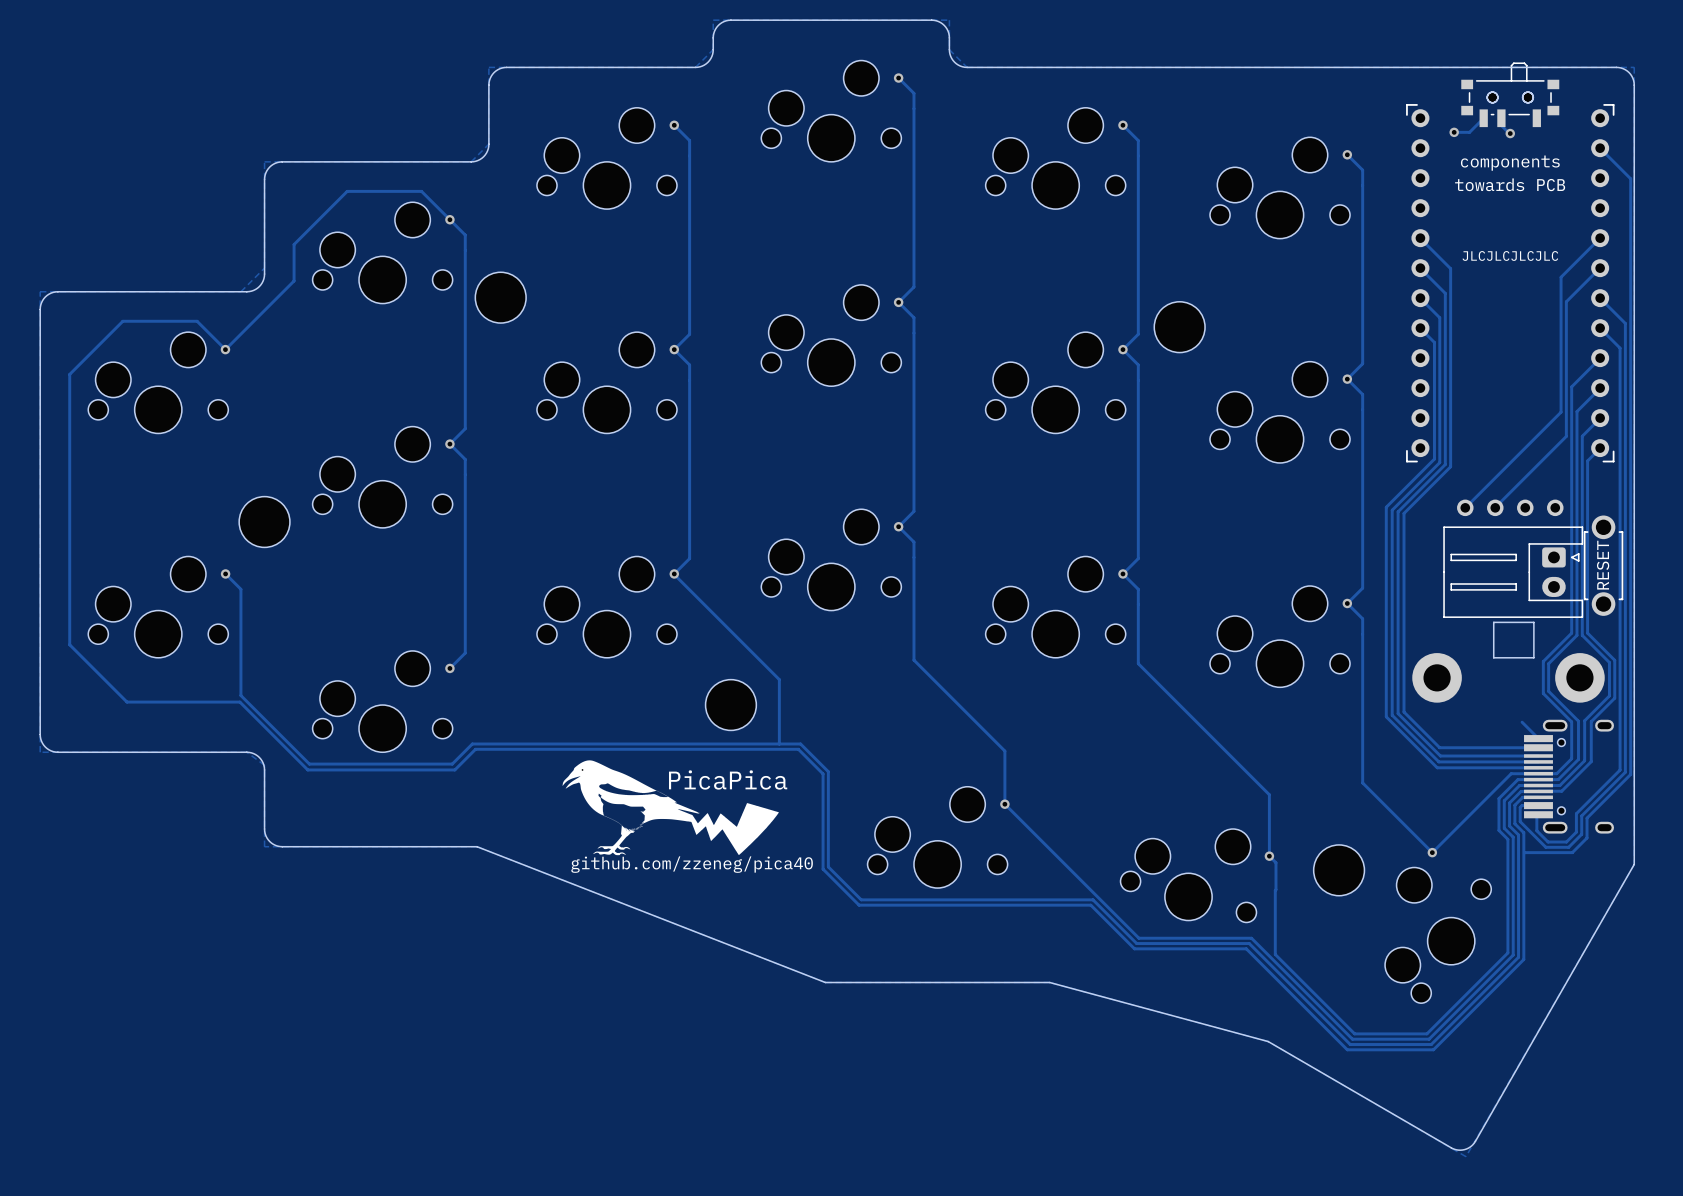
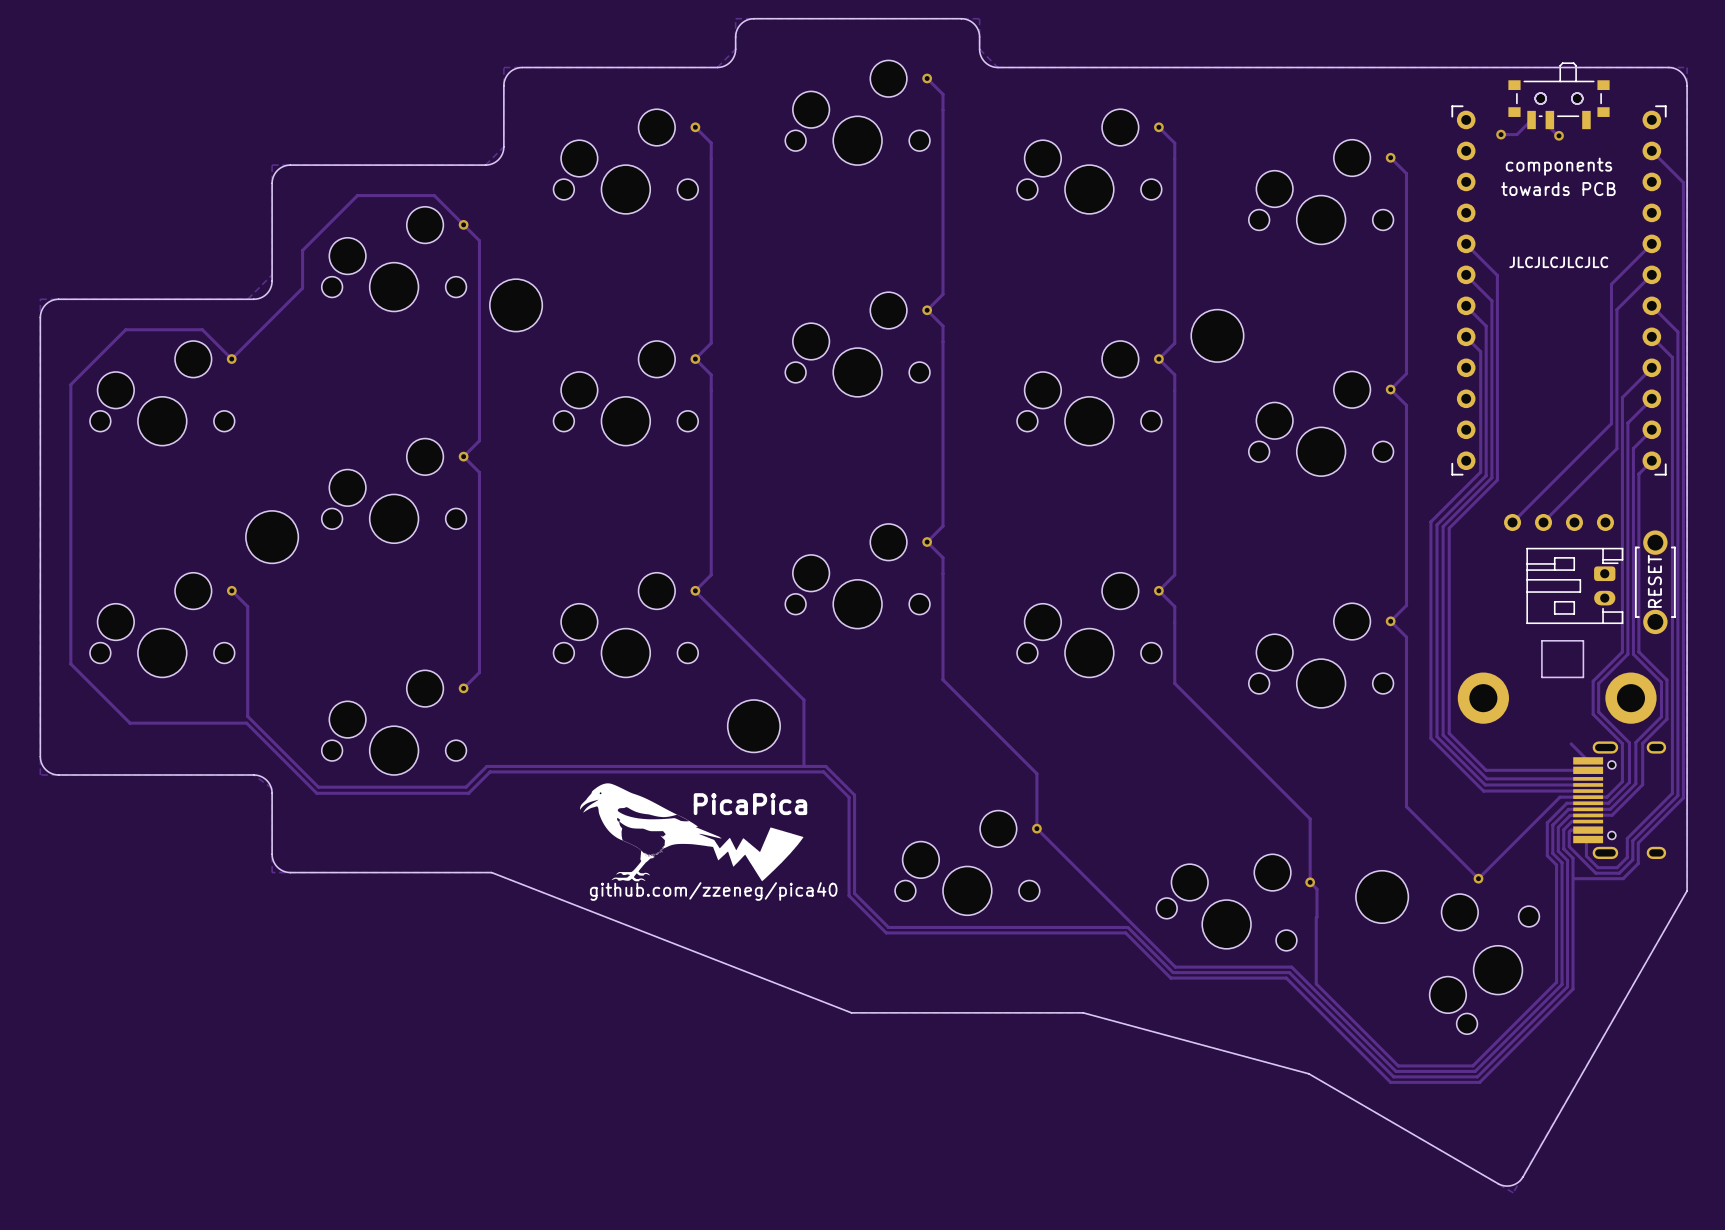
part: none -> (1574, 585)
part: (1513, 572) -> none

